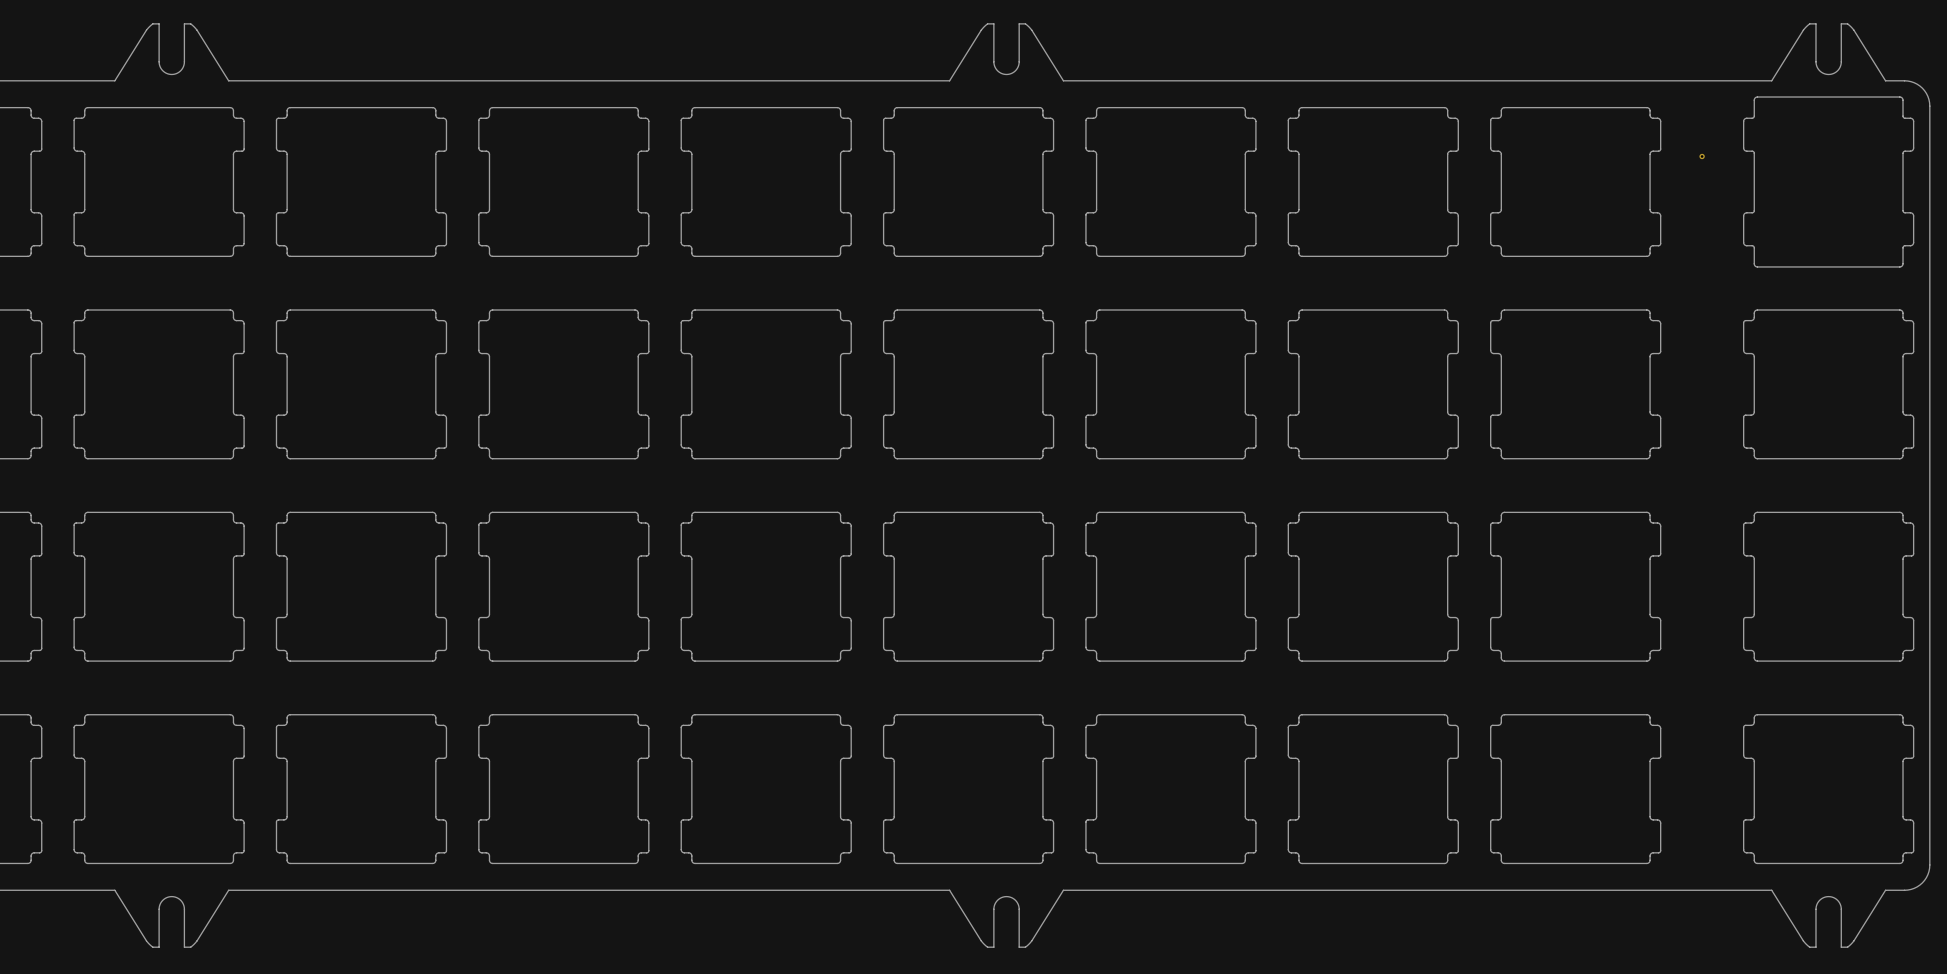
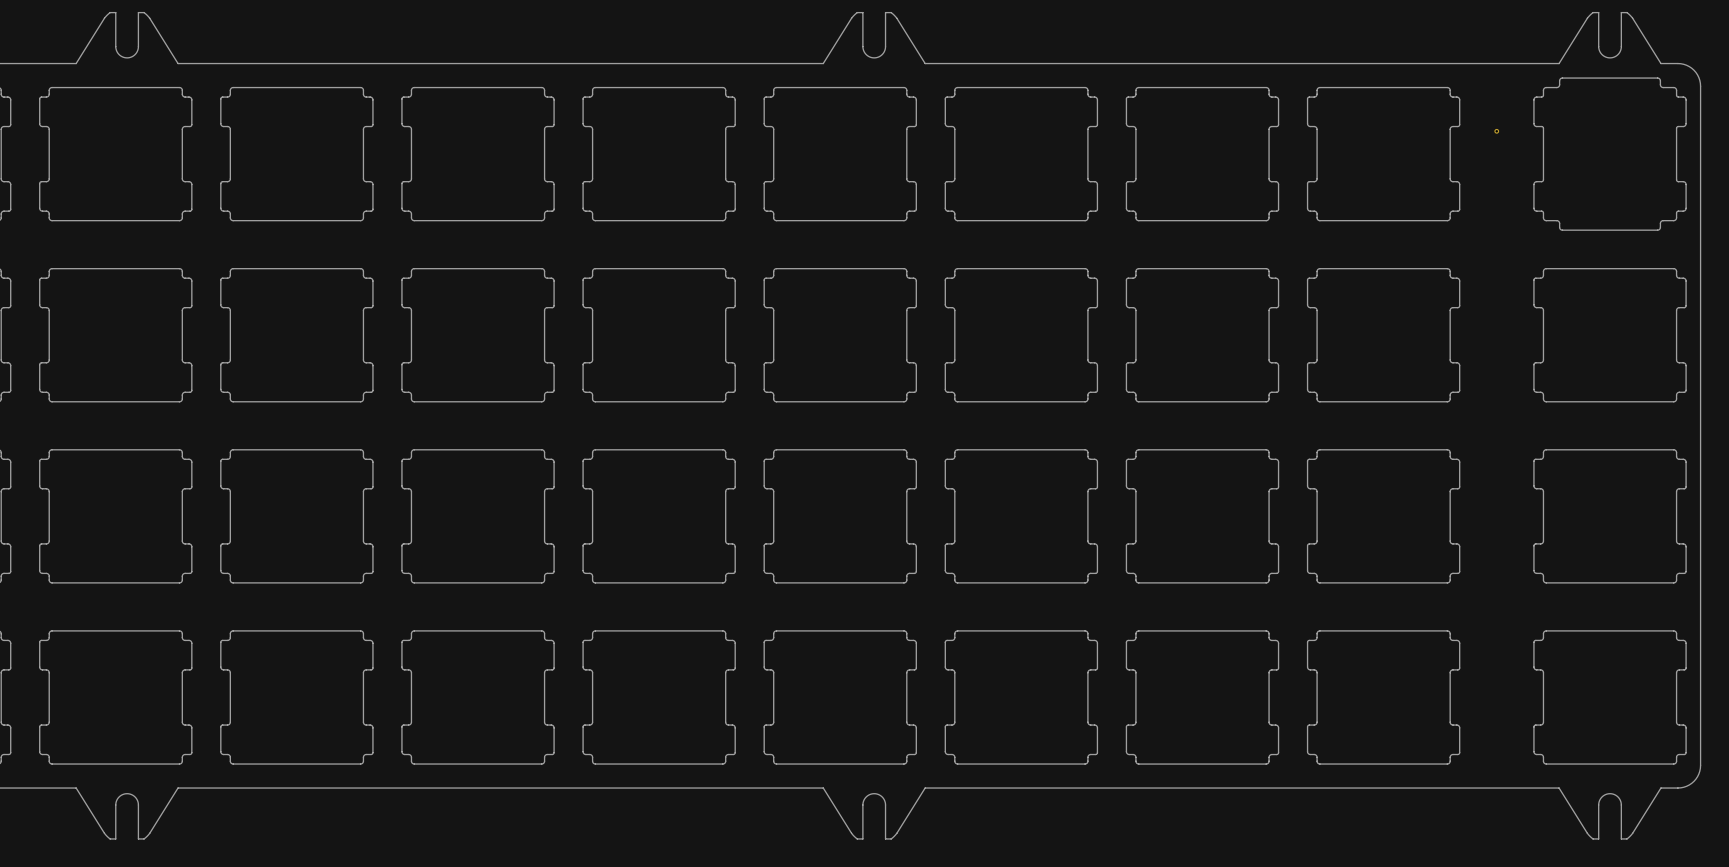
drawing shape: [1743, 96, 1915, 268] -> [1533, 77, 1687, 231]

